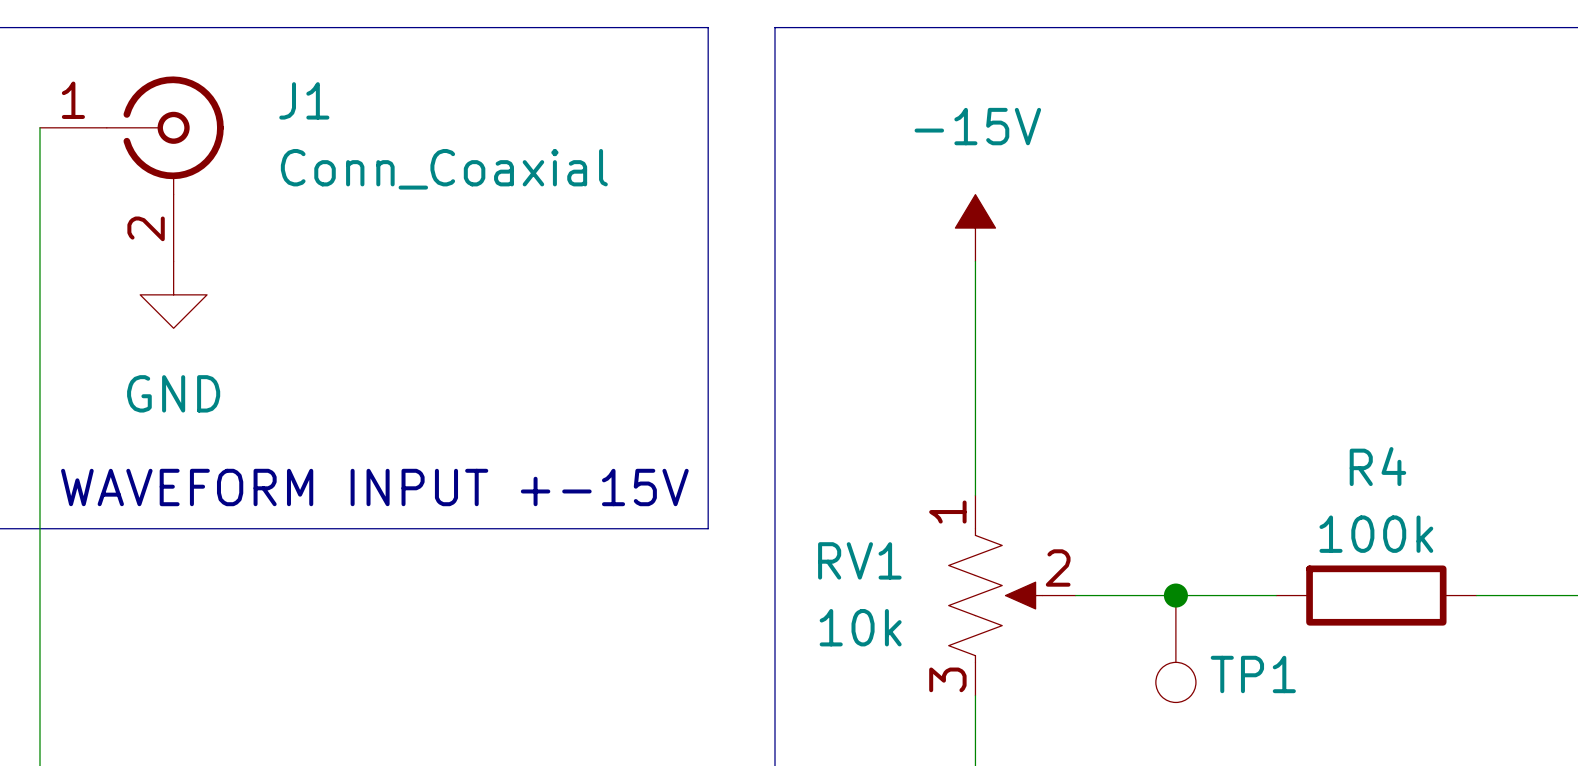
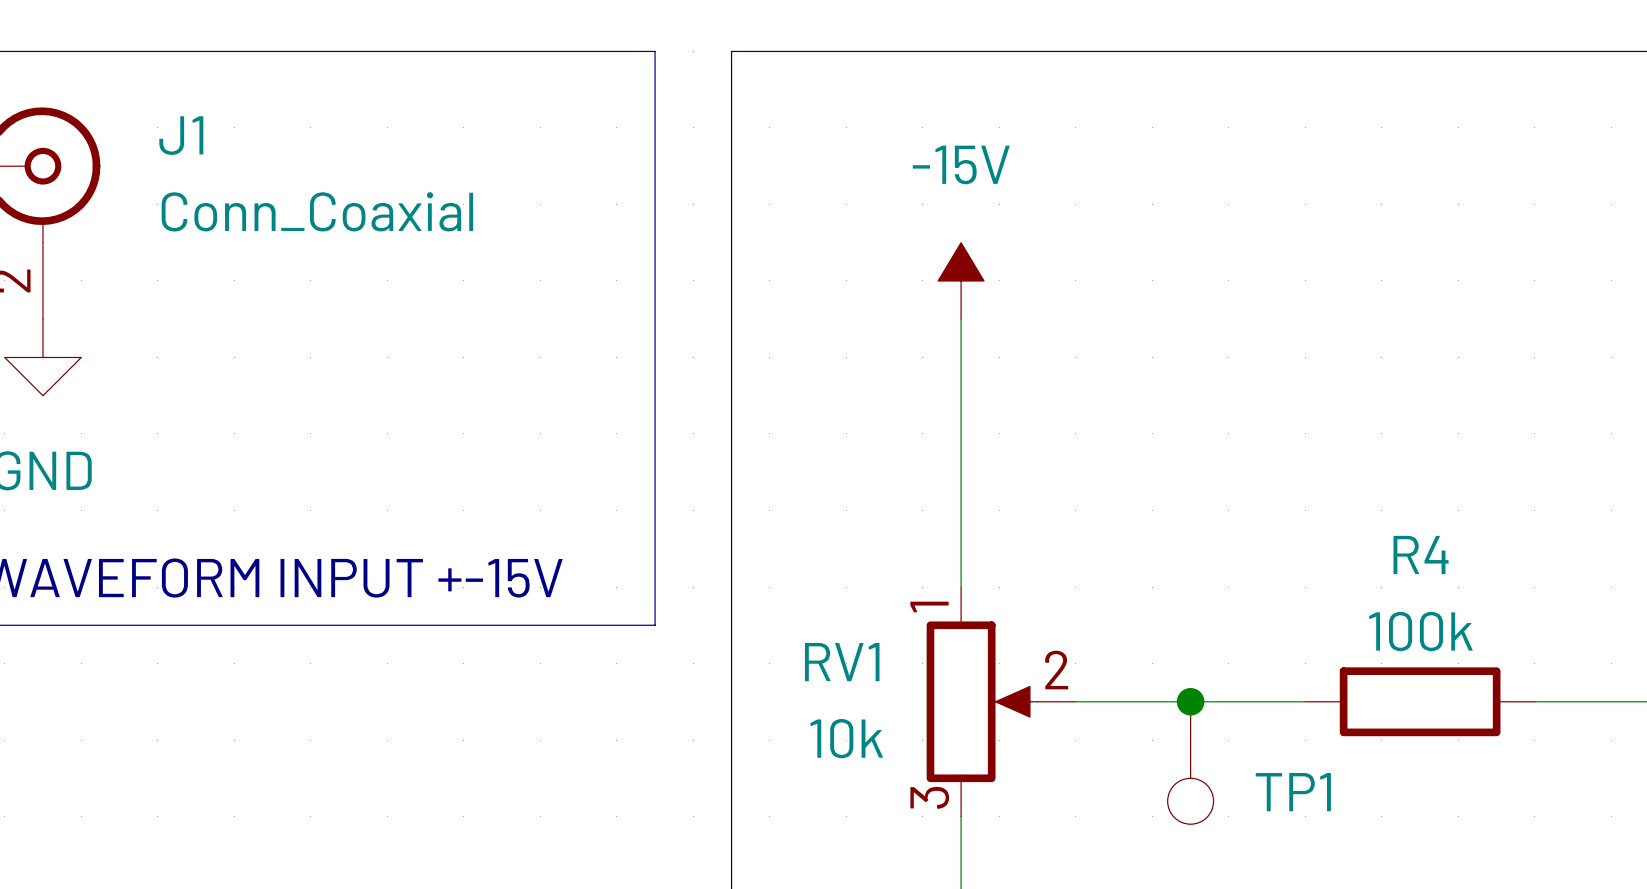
RV1 symbol: [948, 495, 1076, 696] -> [926, 587, 1076, 817]

